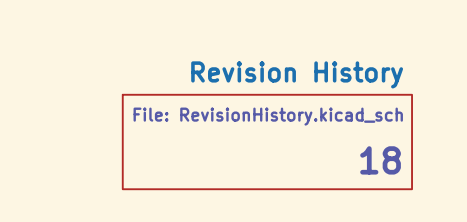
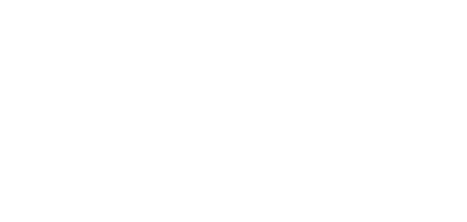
text: File: RevisionHistory.kicad_sch (268, 116) -> none
sheet Revision History: (267, 142) -> none
text: 18 (380, 160) -> none

